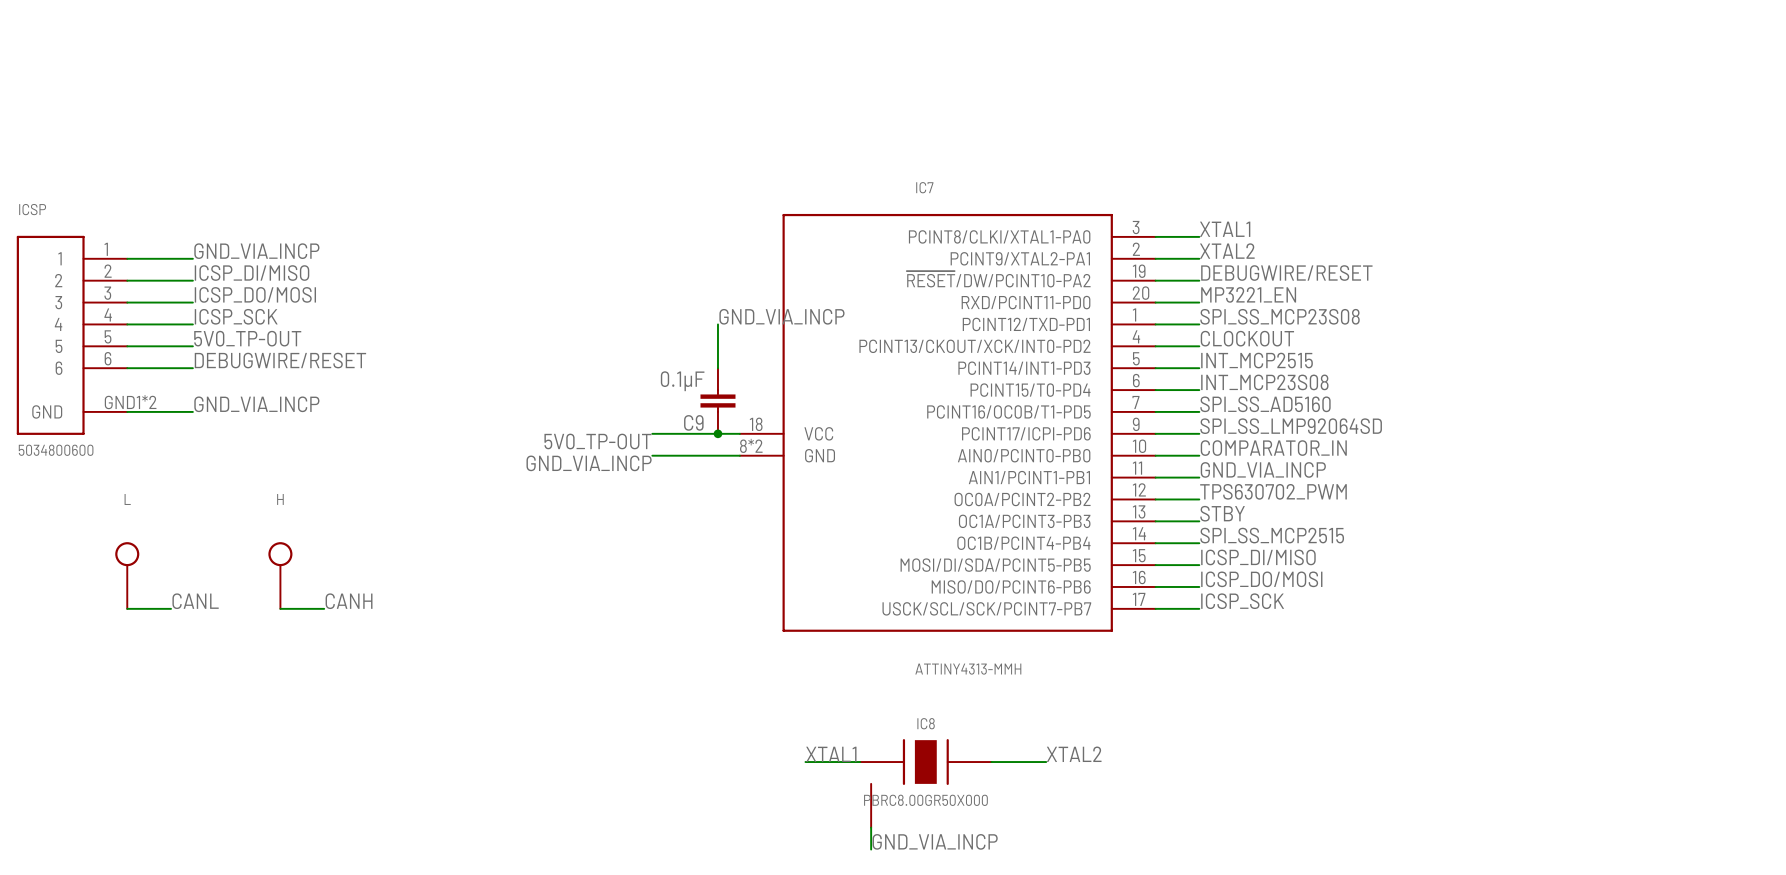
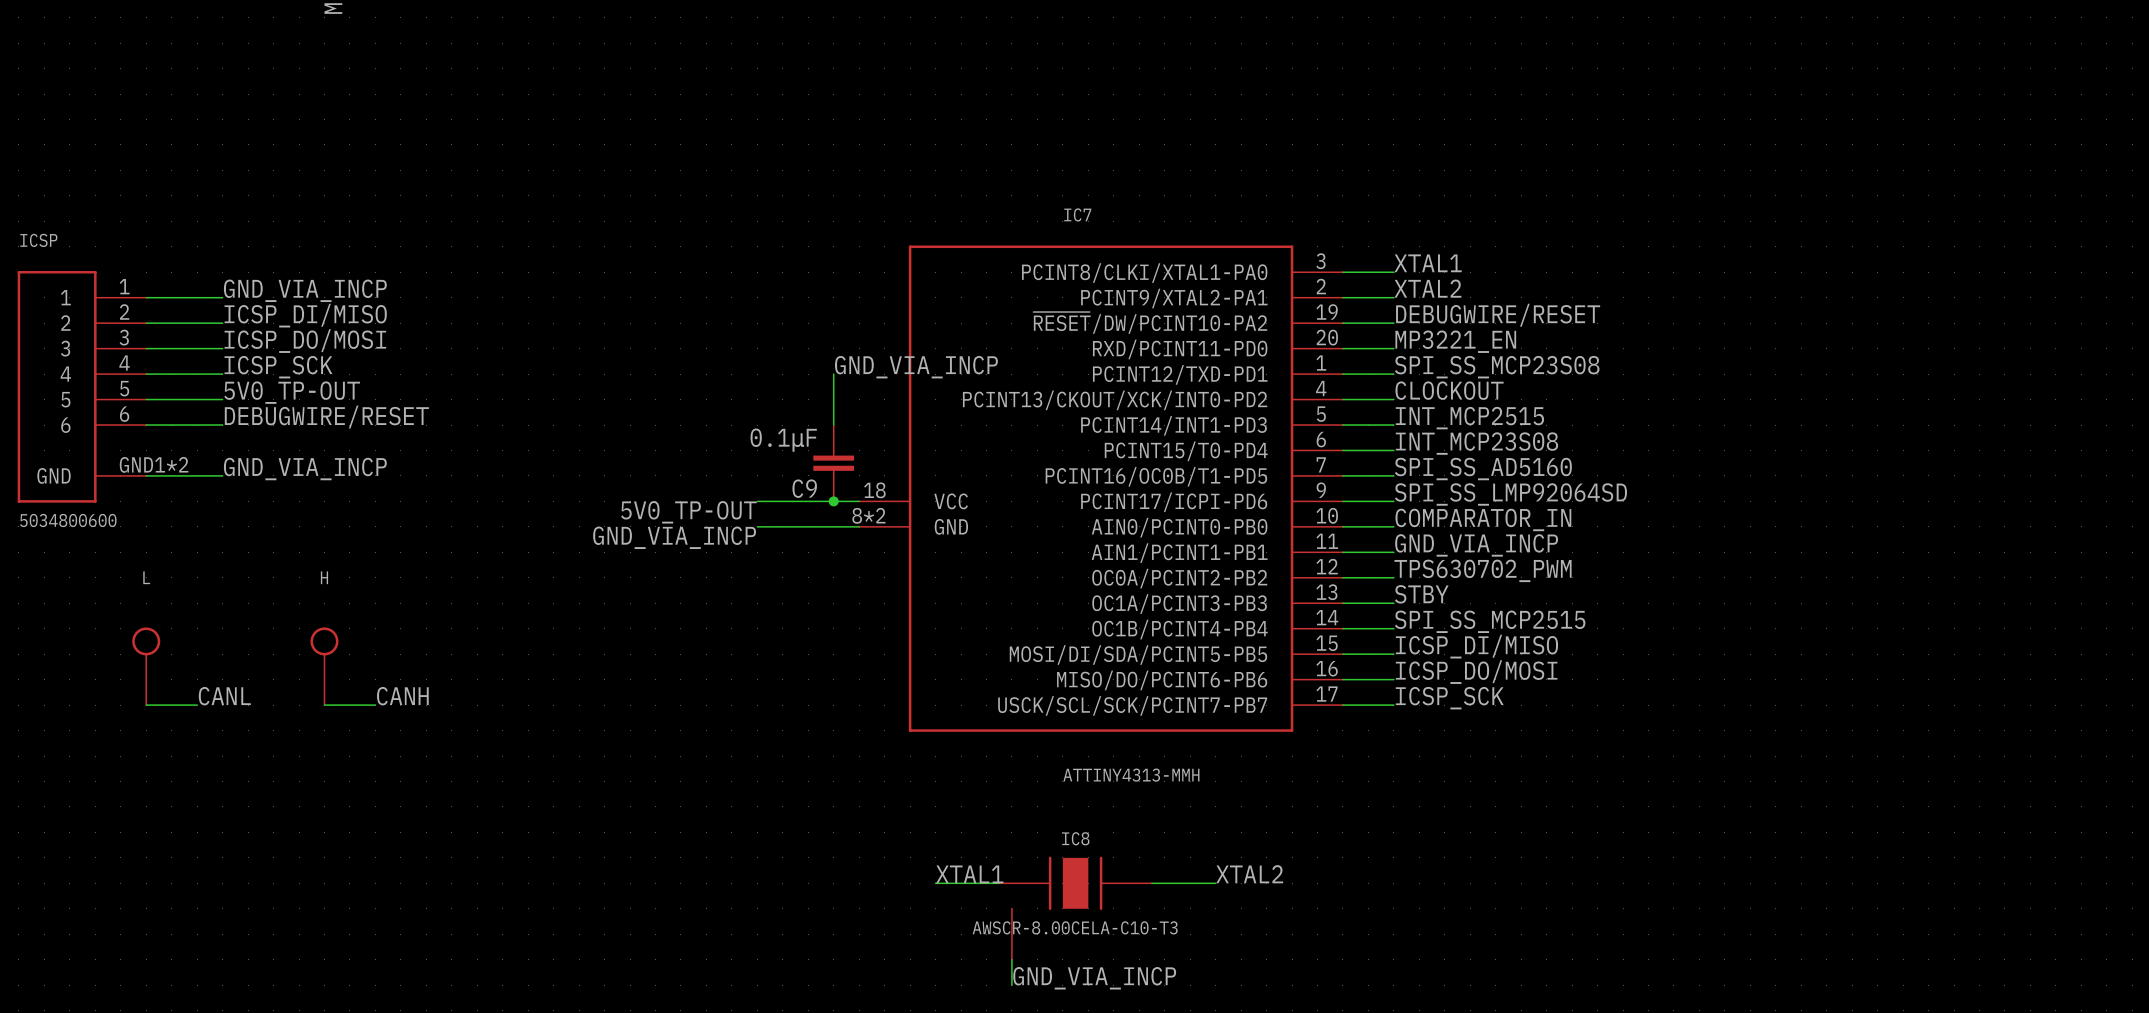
IC8 value: PBRC8.00GR50X000 (925, 800) -> AWSCR-8.00CELA-C10-T3 (1075, 927)

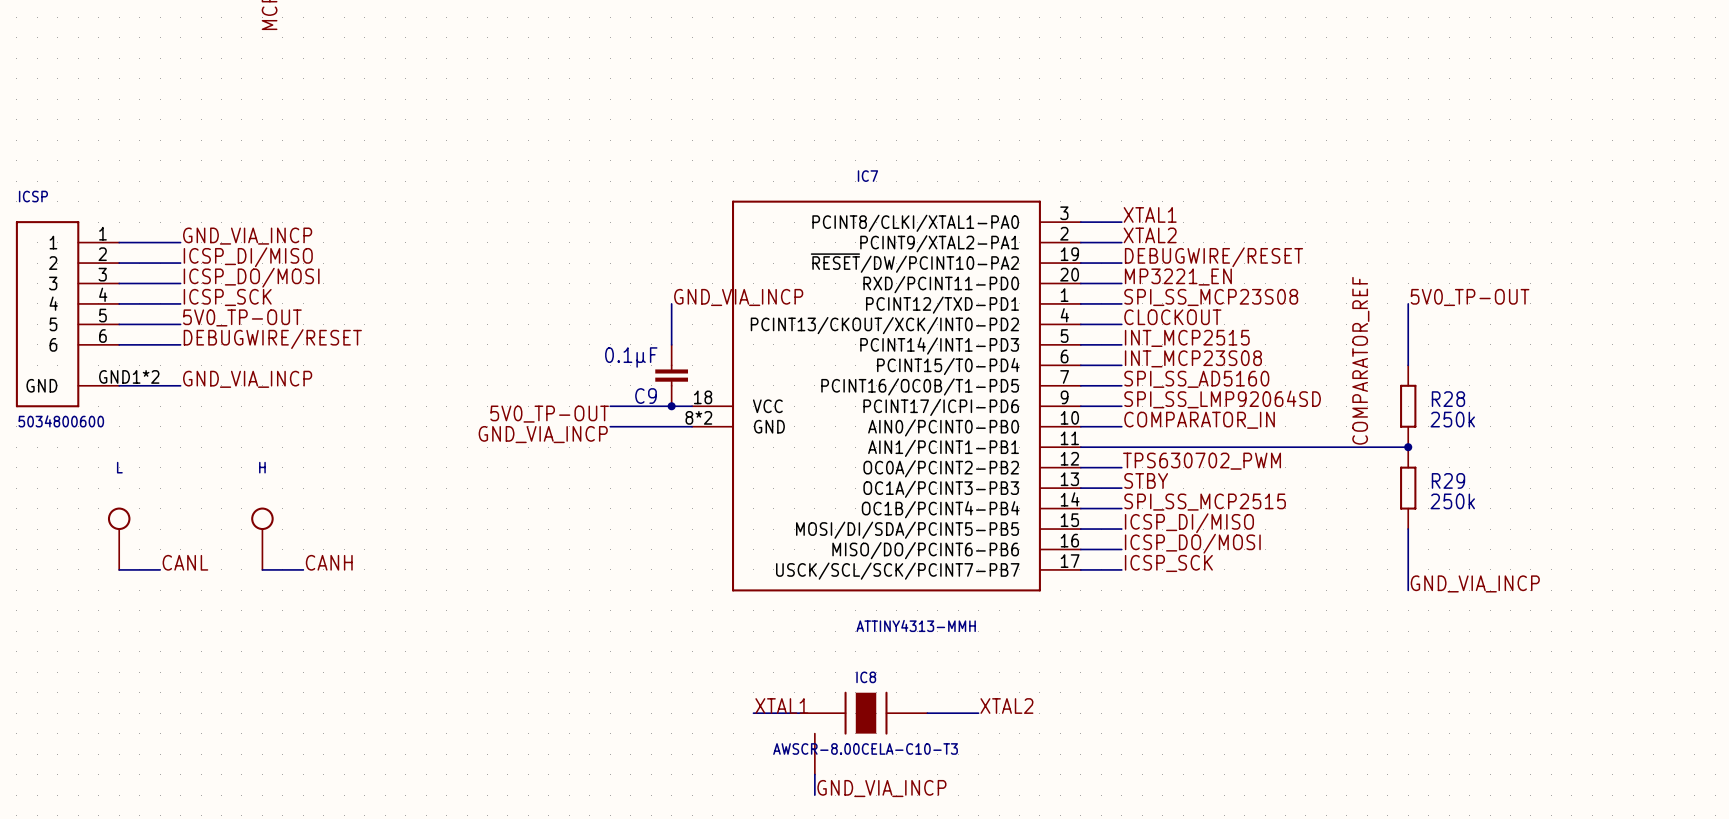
label: none -> 5V0_TP-OUT (1470, 297)
wire: none -> (1408, 303) (1408, 365)
label: none -> COMPARATOR_REF (1360, 360)
R28: none -> 250k (1408, 406)
label: GND_VIA_INCP (1476, 545) -> none
wire: none -> (1121, 447) (1408, 447)
junction: none -> (1408, 447)
R29: none -> 250k (1408, 488)
wire: none -> (1408, 529) (1408, 590)
label: none -> GND_VIA_INCP (1475, 583)

